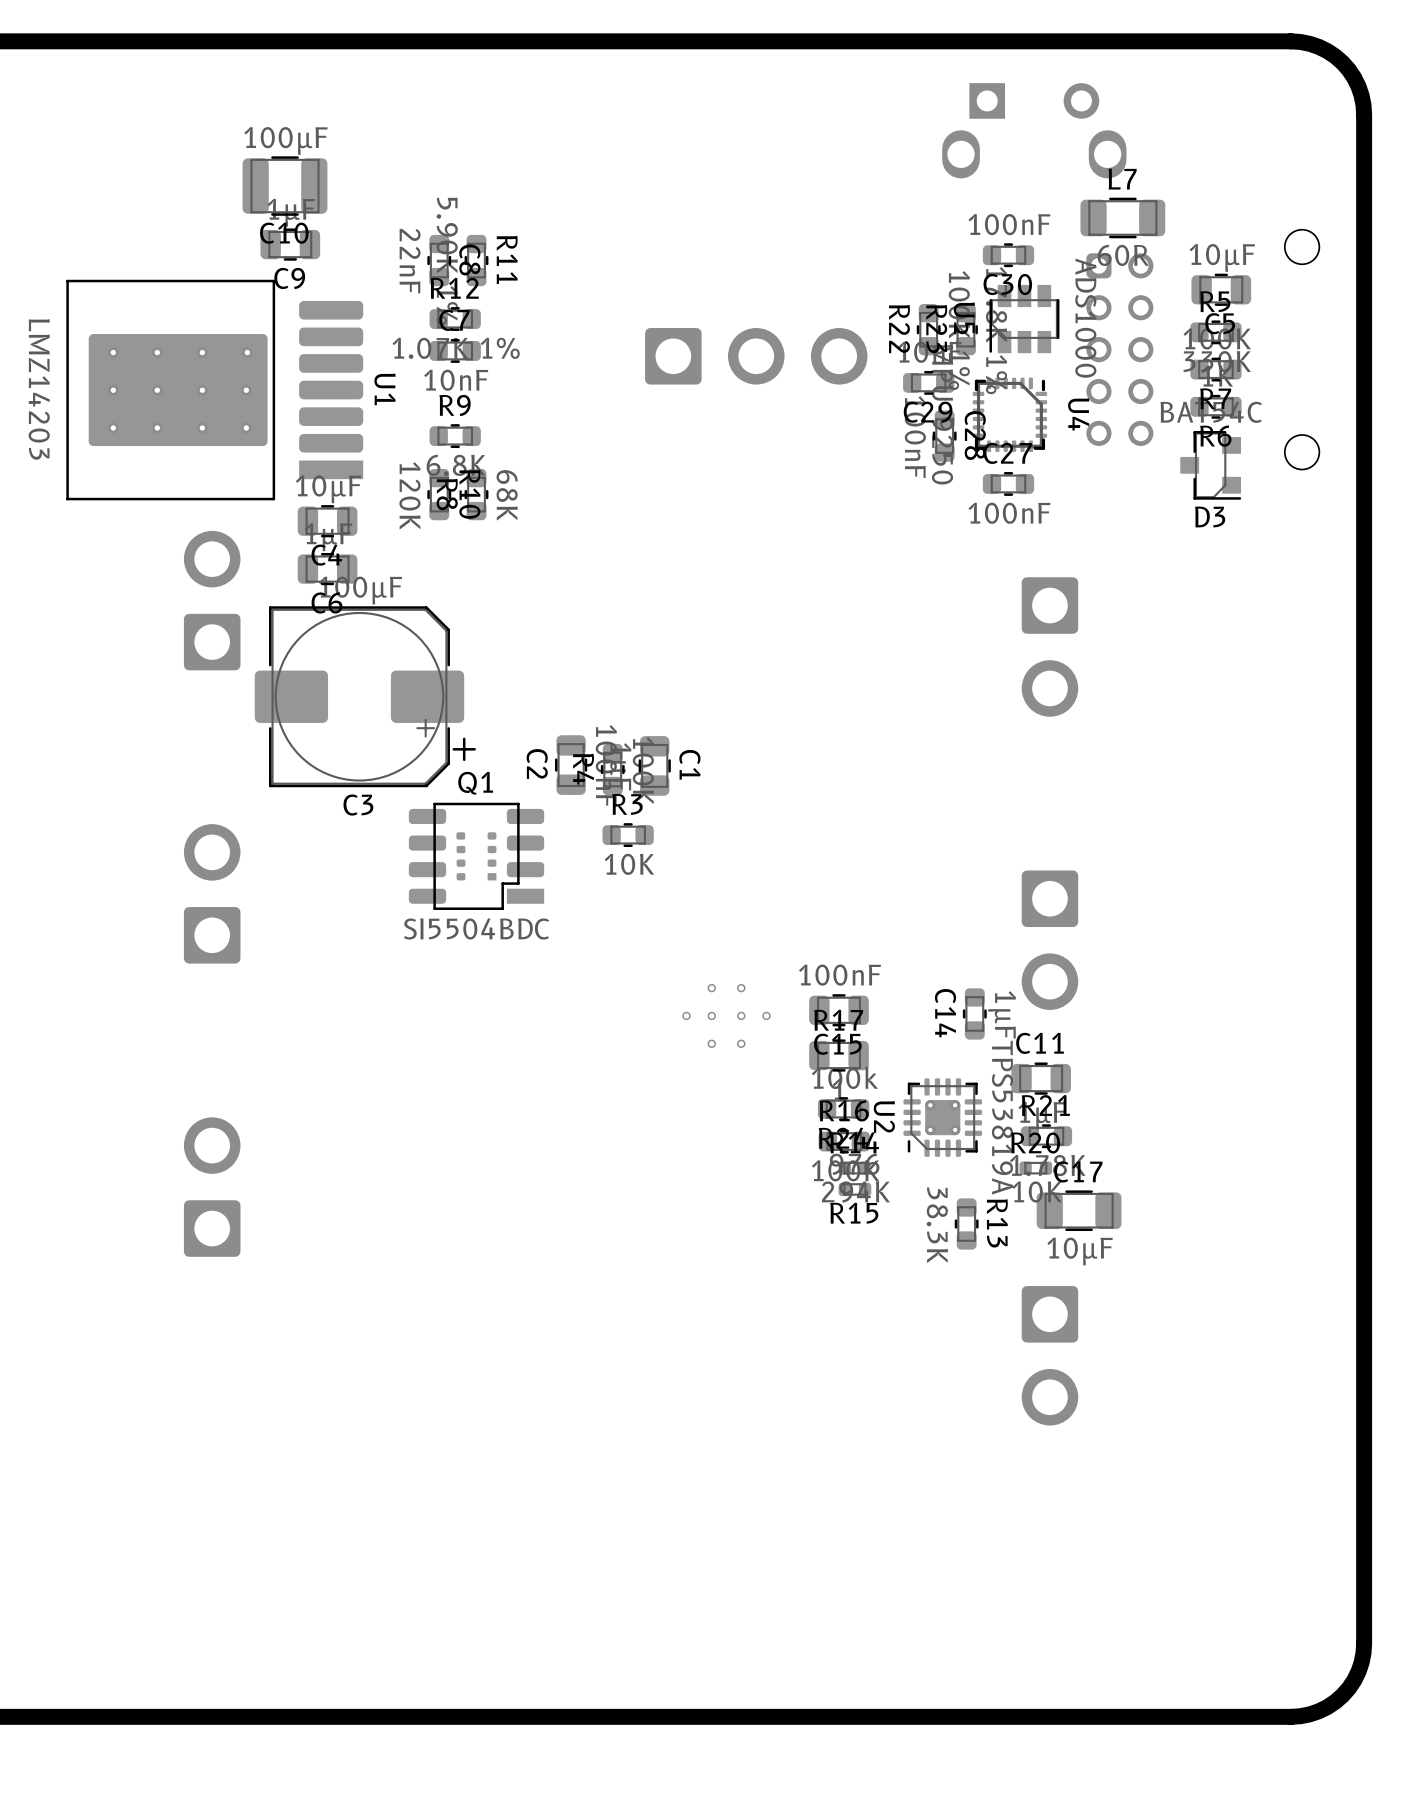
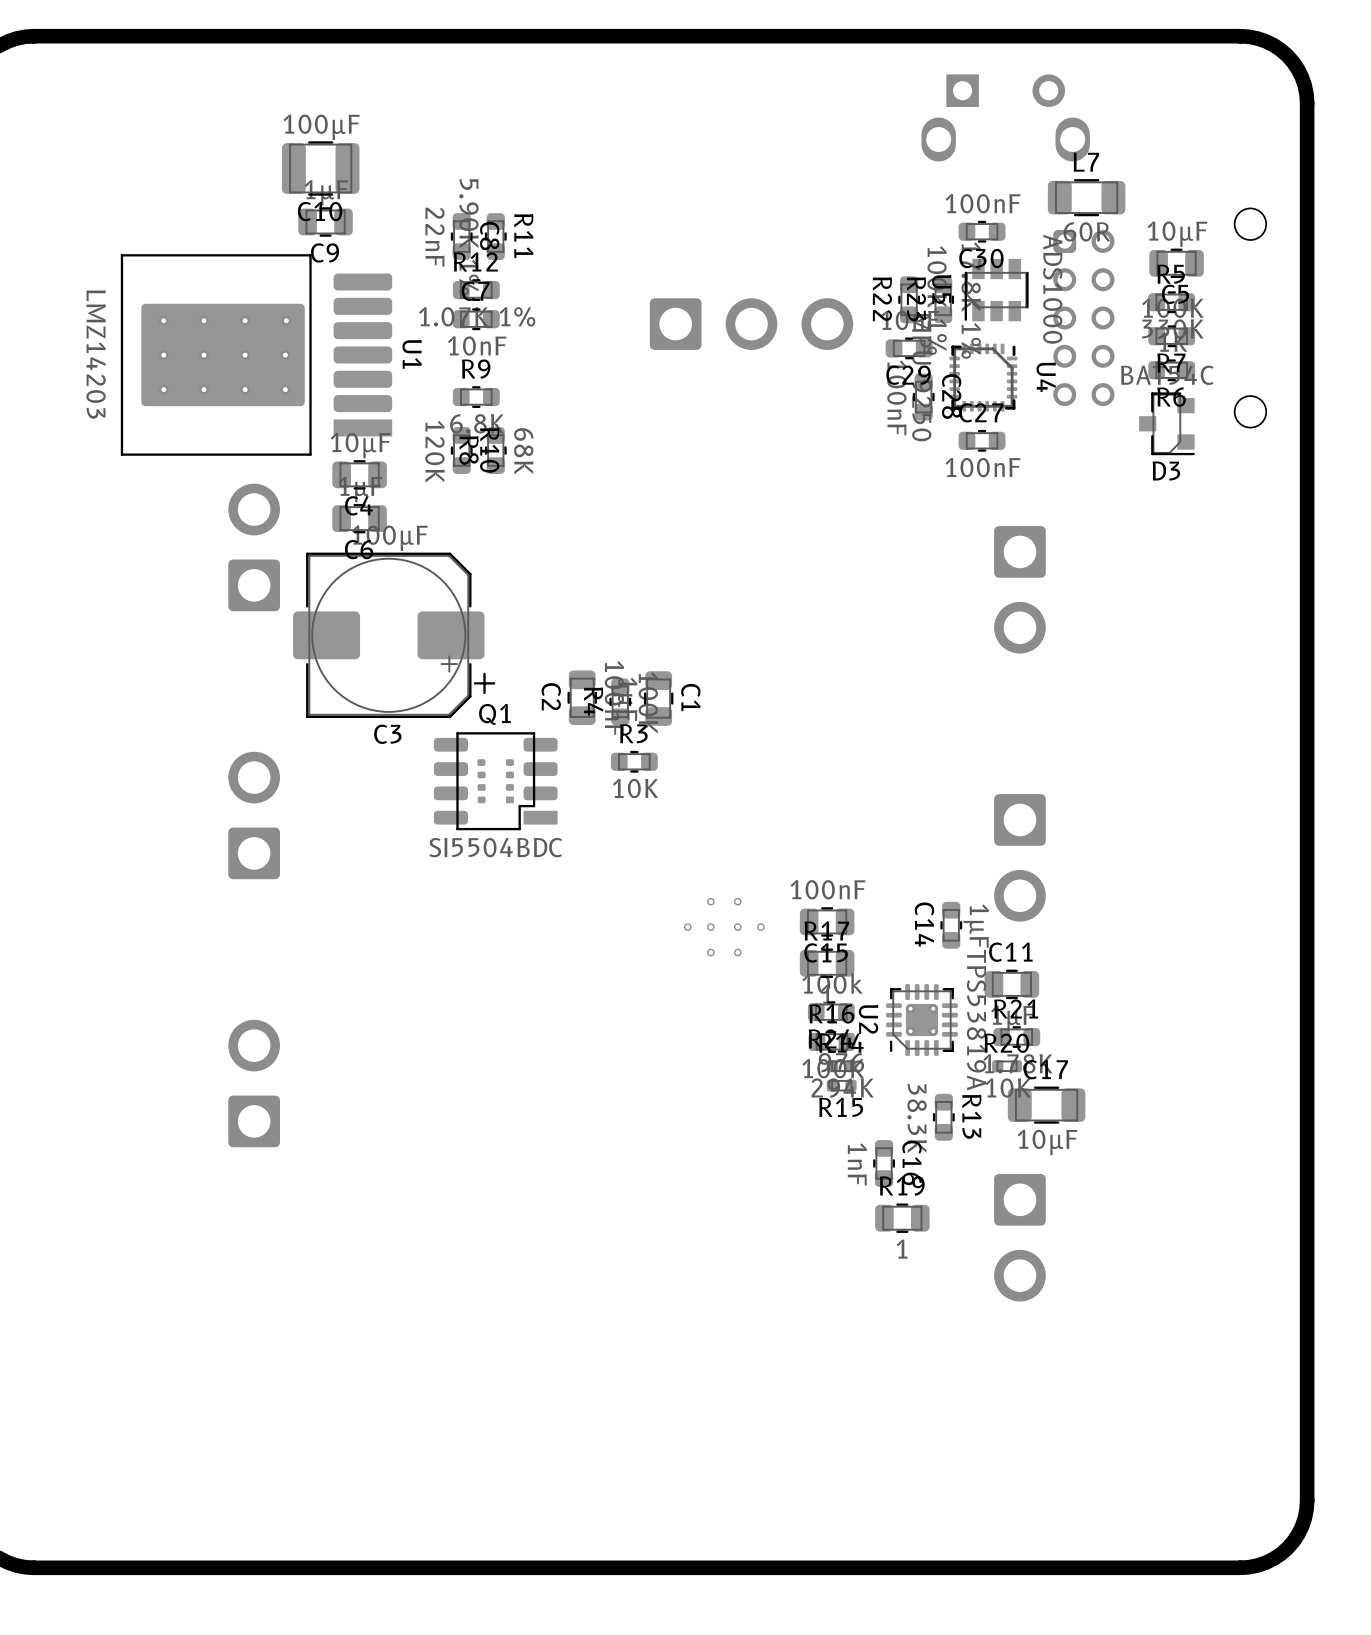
C16: none -> 1nF (884, 1163)
R19: none -> 1 (902, 1218)

